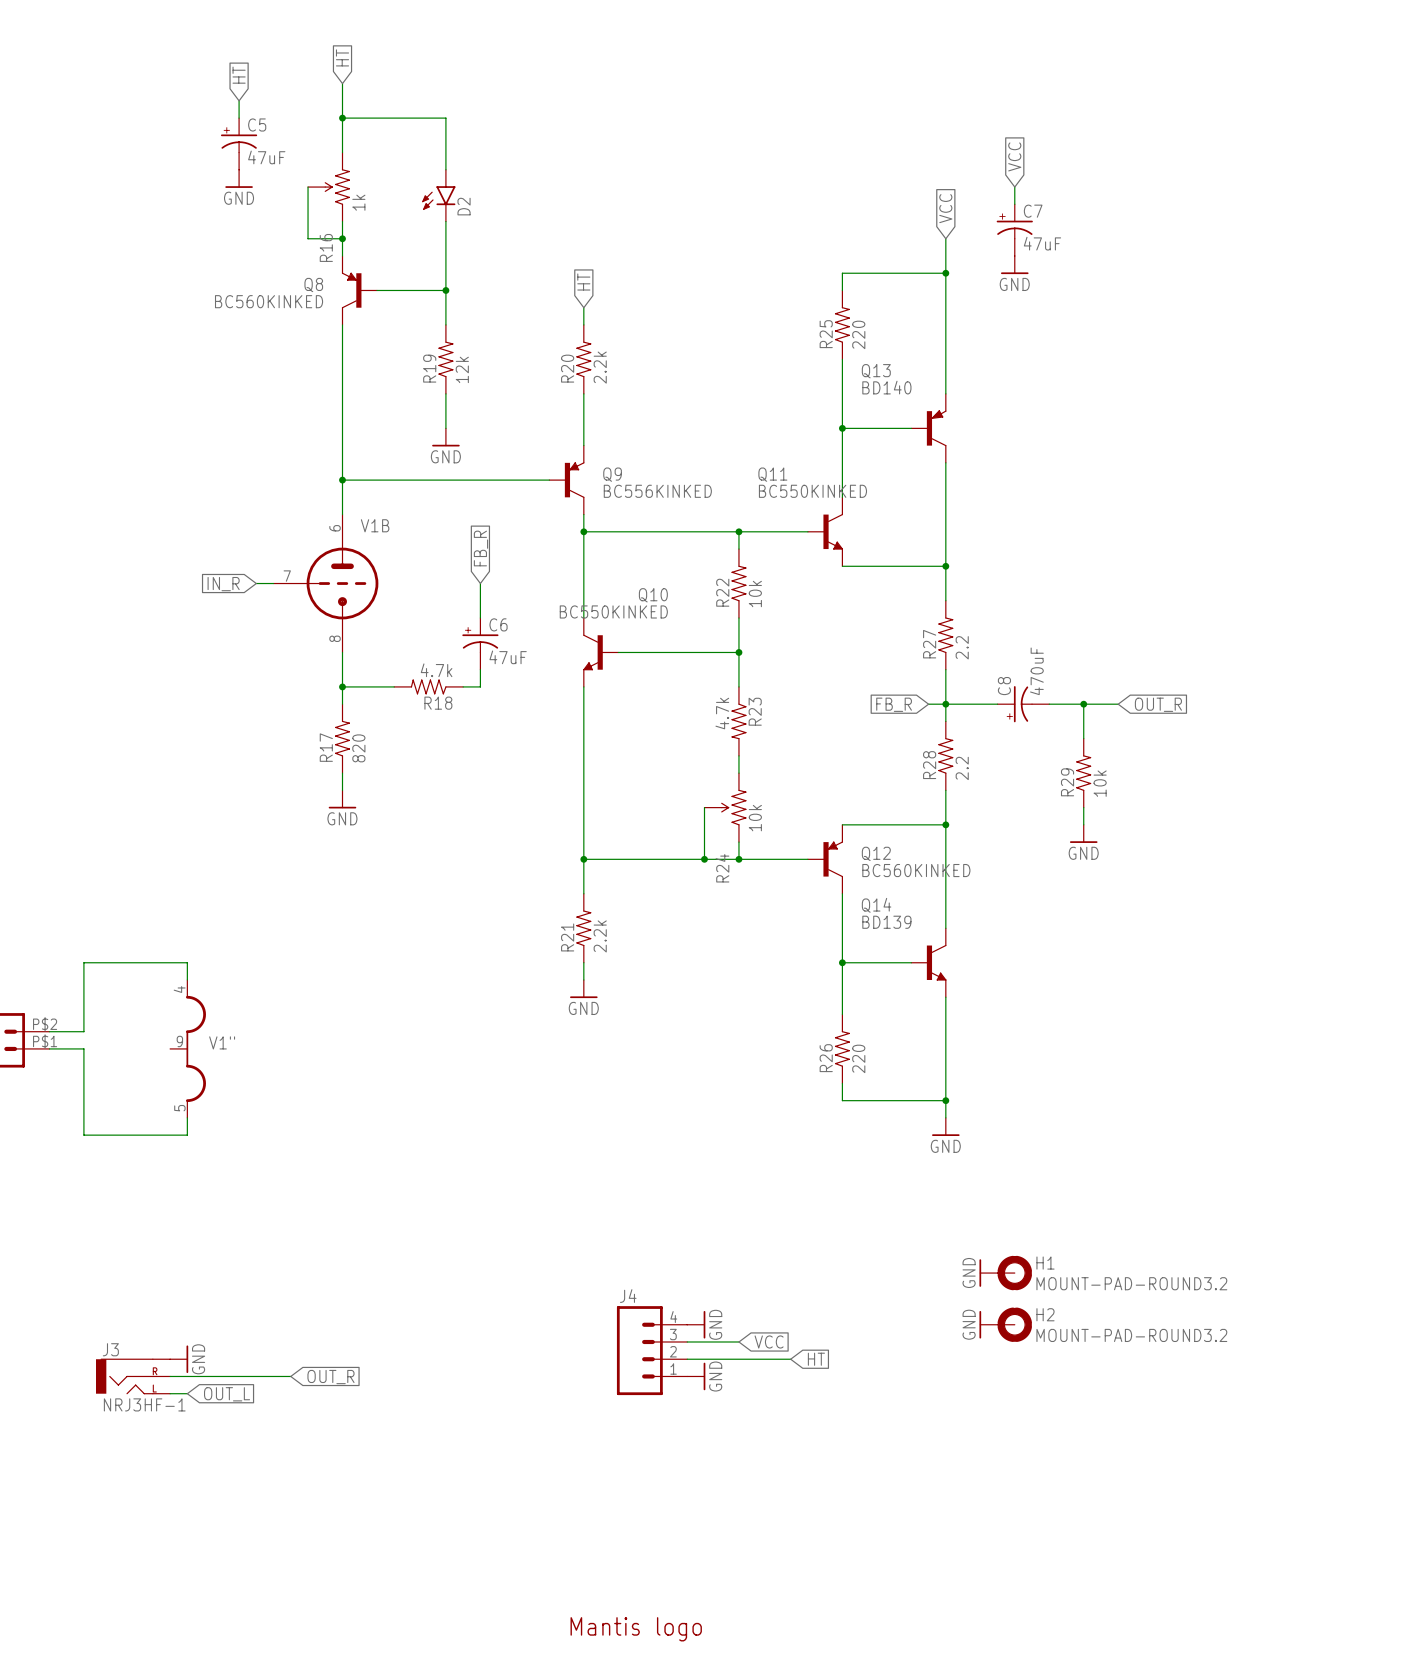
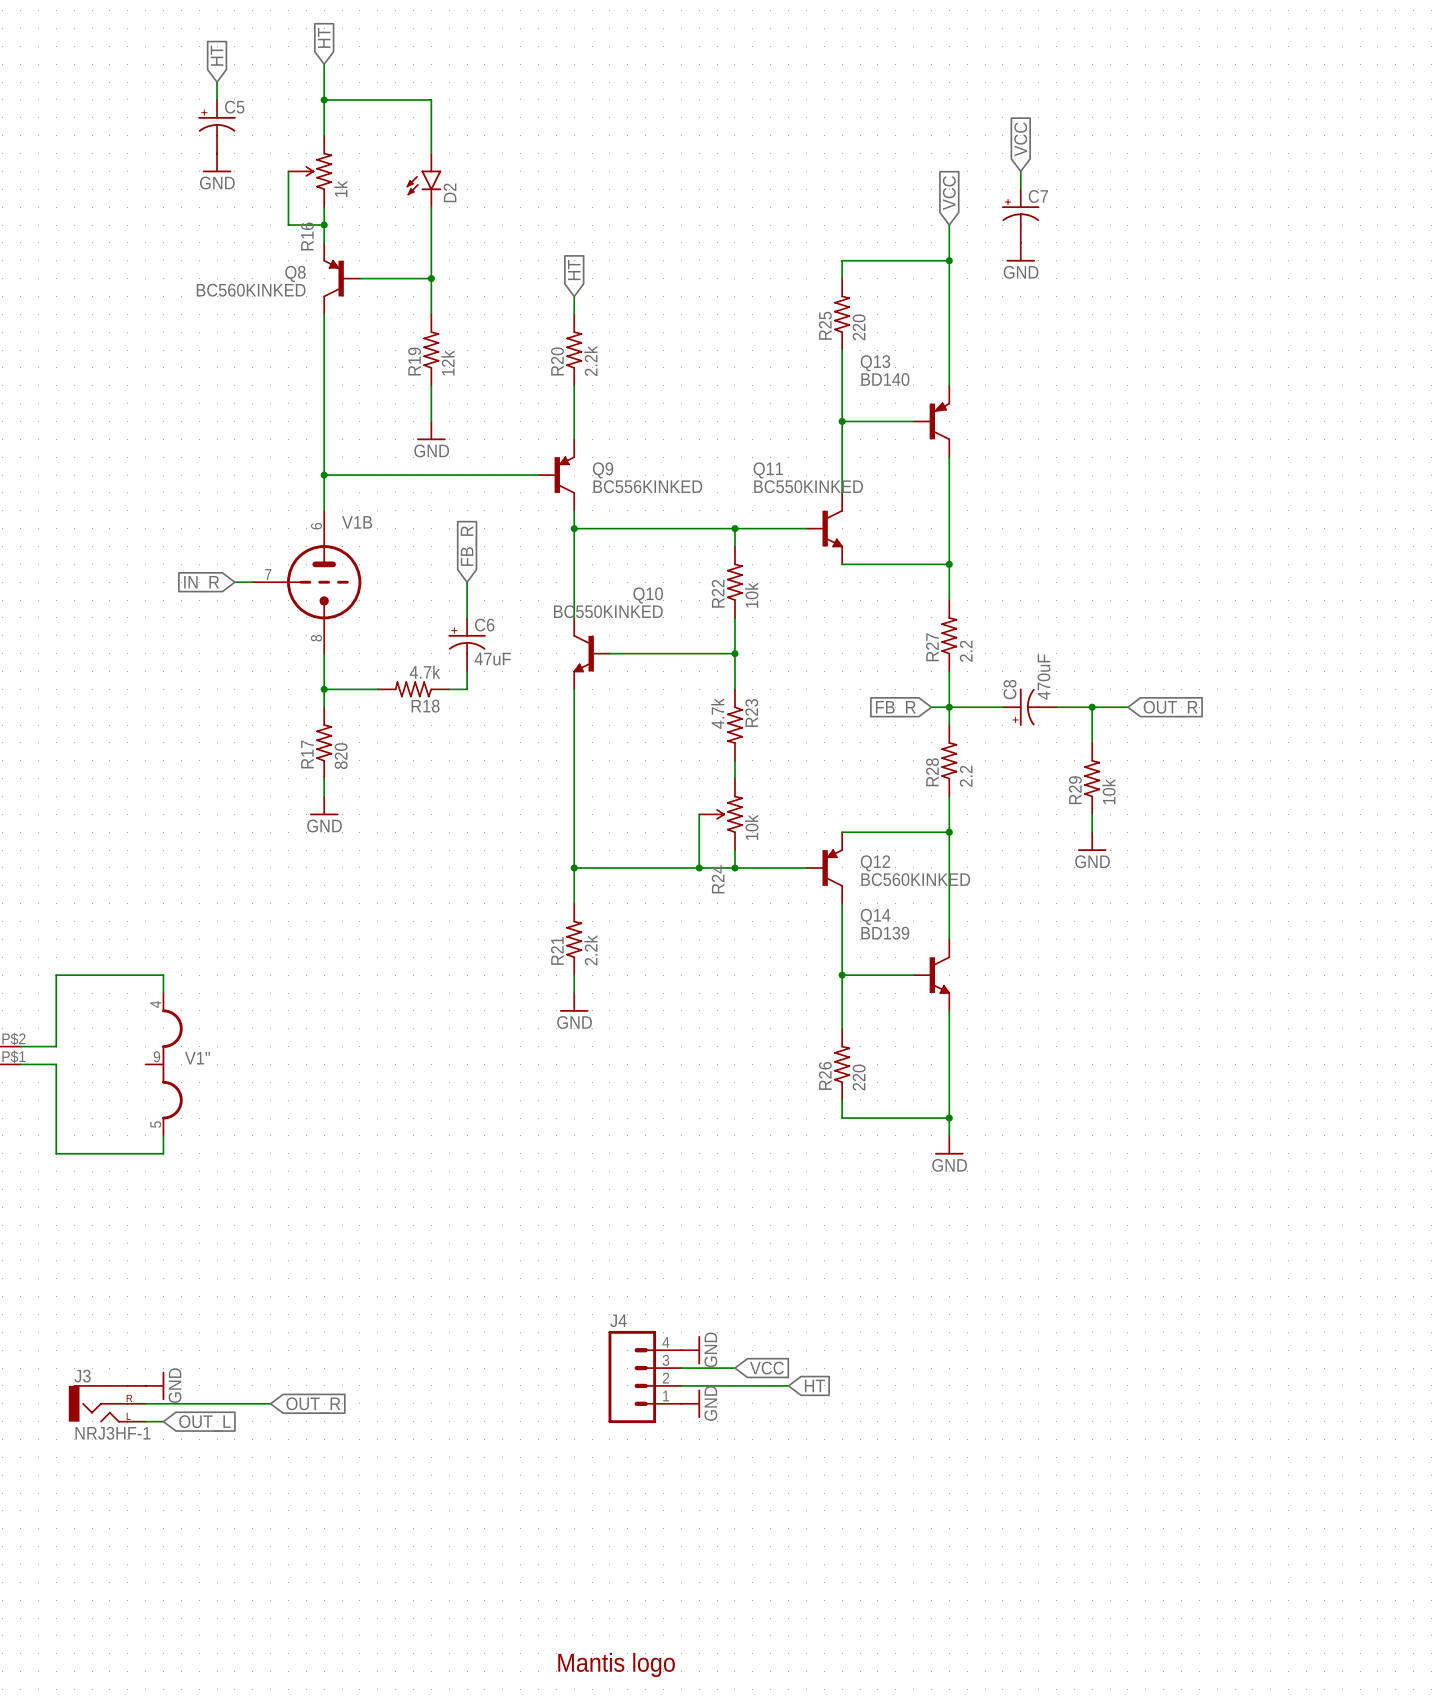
C5 value: 47uF (266, 157) -> none
C7 value: 47uF (1042, 243) -> none
power symbol: GND (988, 1273) -> none
H1: MOUNT-PAD-ROUND3.2 (1014, 1273) -> none
power symbol: GND (988, 1324) -> none
H2: MOUNT-PAD-ROUND3.2 (1014, 1324) -> none

